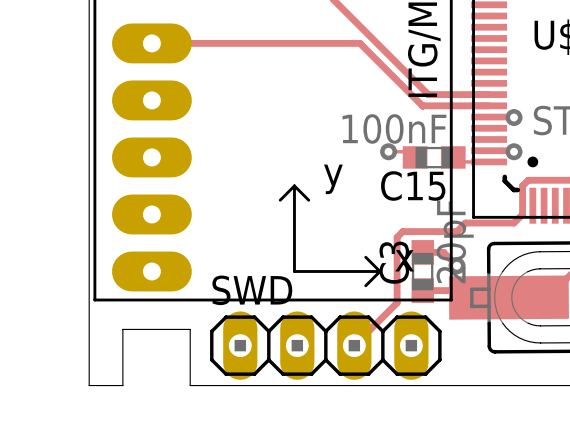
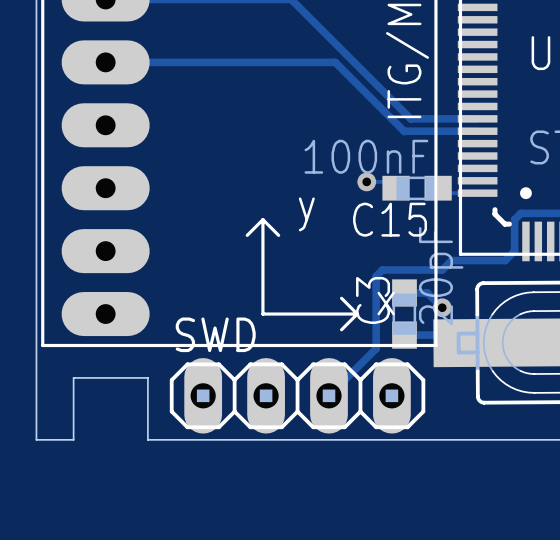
via: (514, 117) -> none
via: (514, 151) -> none

